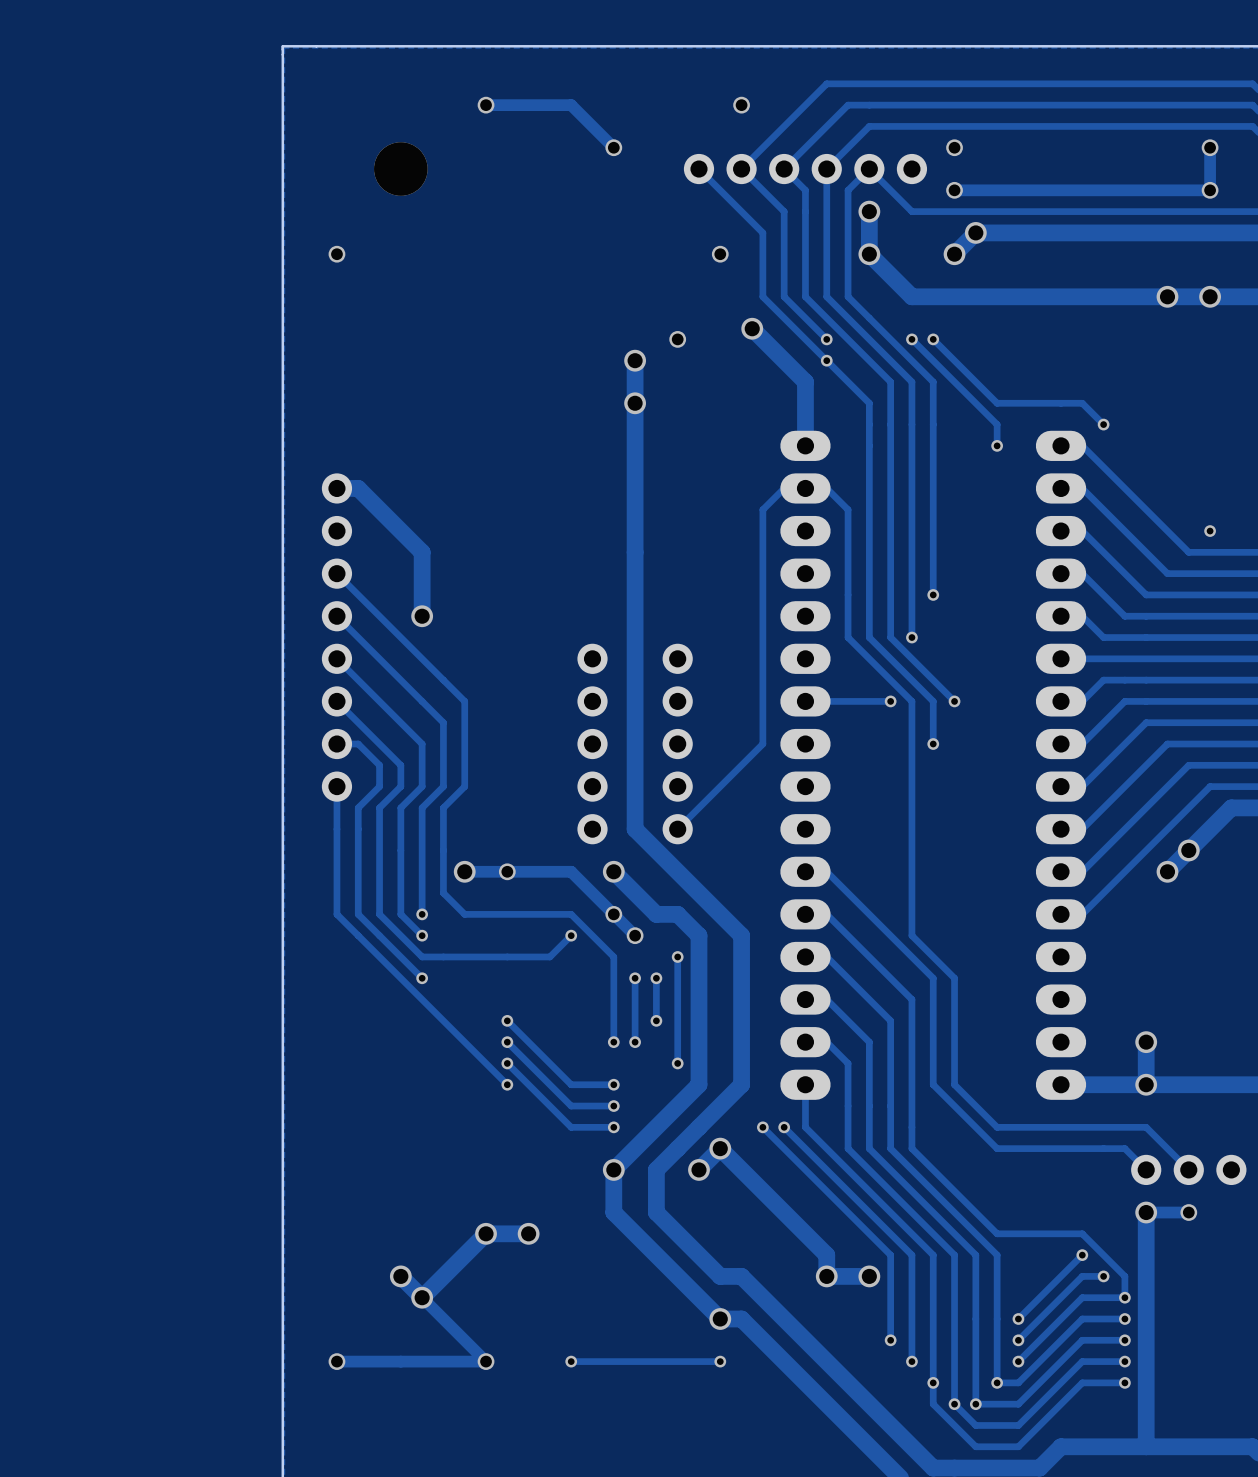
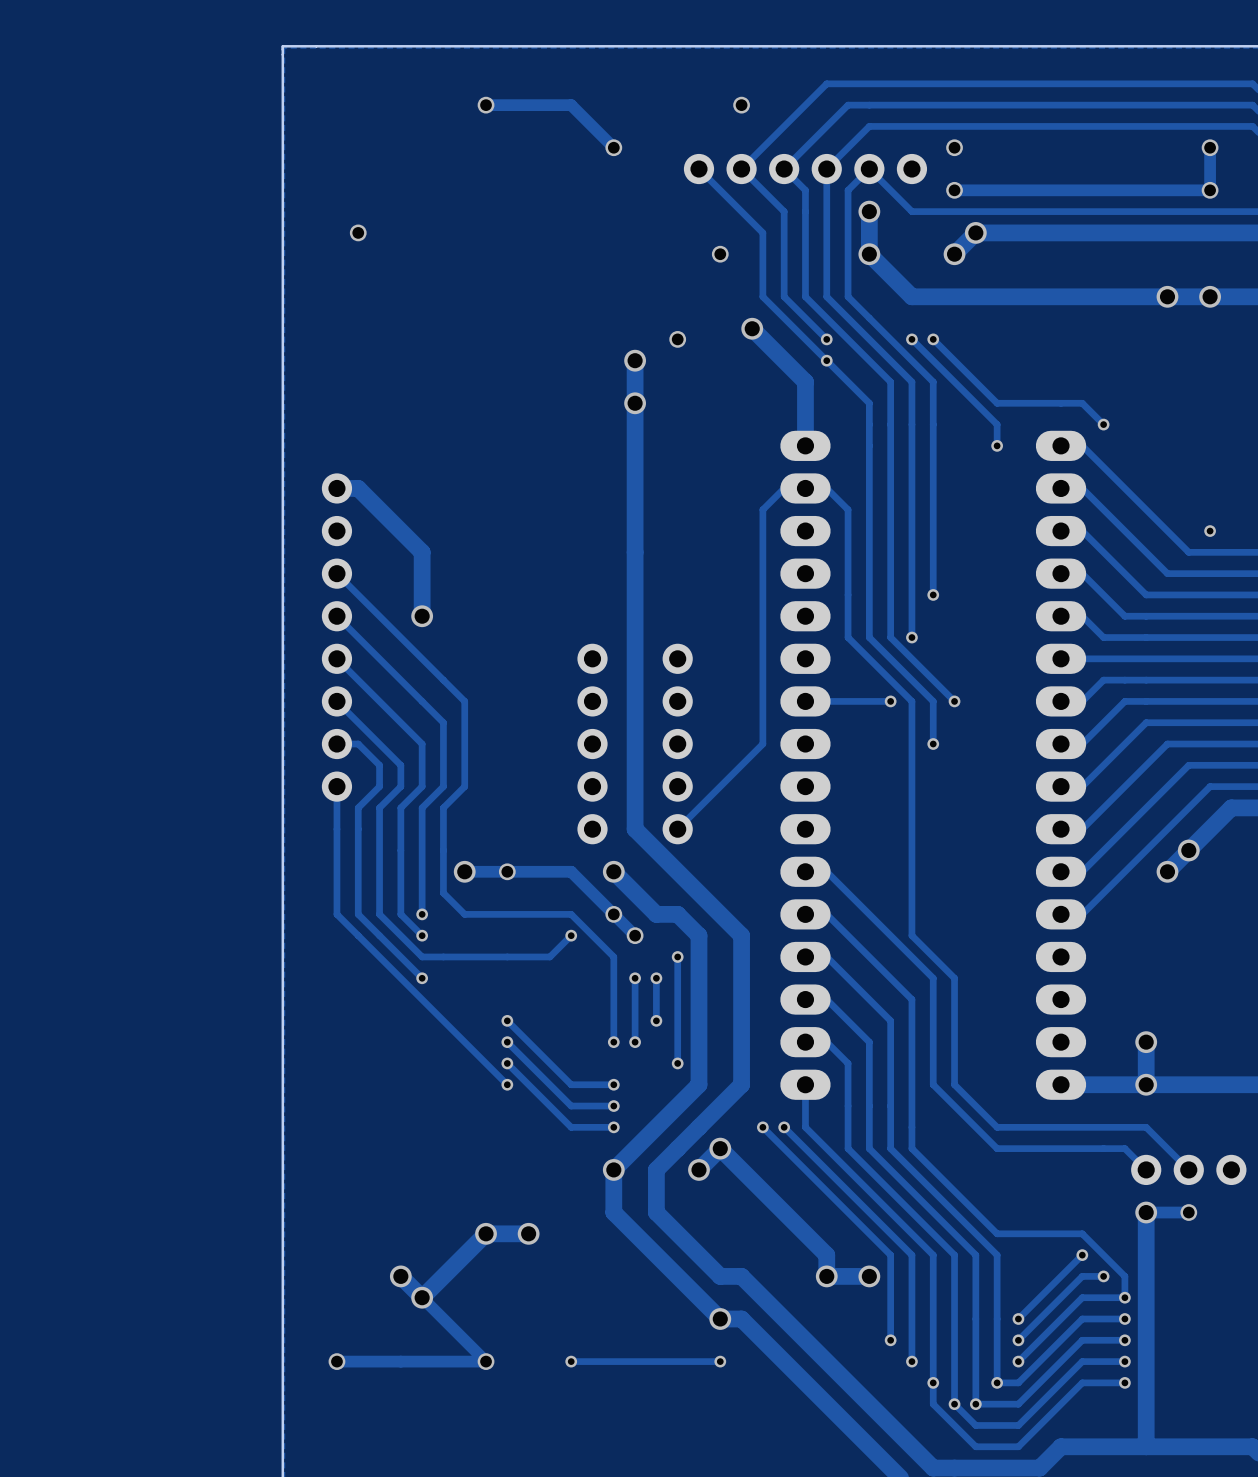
part: (400, 169) -> none
via position: (336, 254) -> (358, 232)

